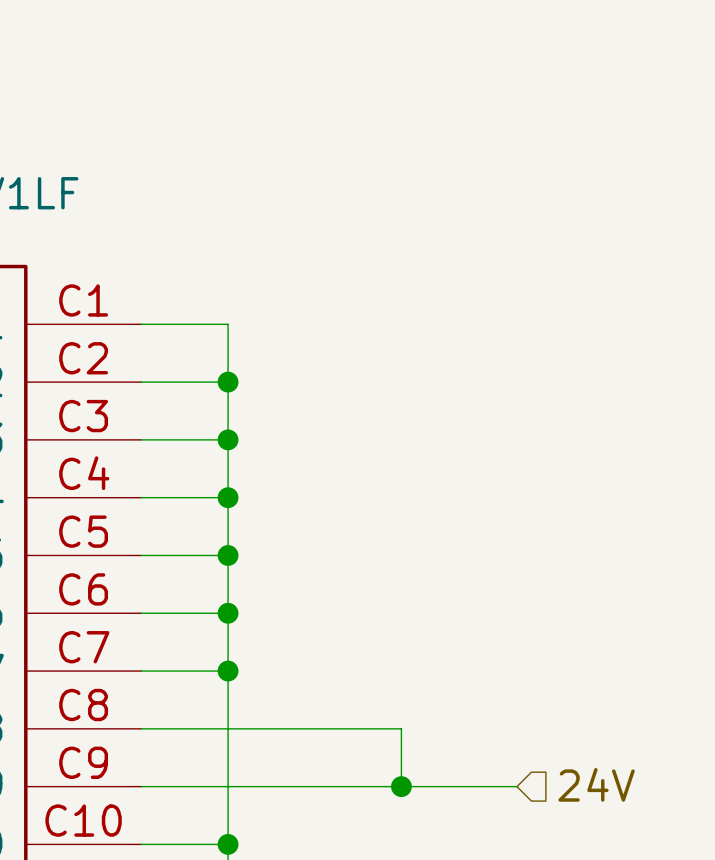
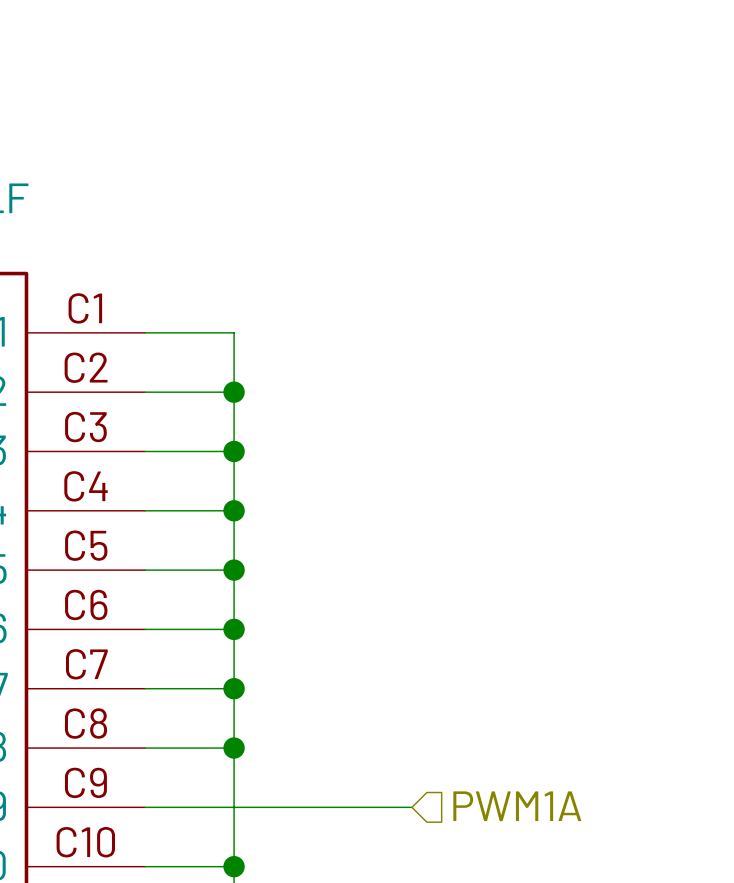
wire: (228, 728) (401, 728) (401, 786) (517, 786) -> none
junction: none -> (234, 748)
hierarchical label: 24V (596, 784) -> none
hierarchical label: none -> PWM1A (517, 806)
junction: (401, 786) -> none

